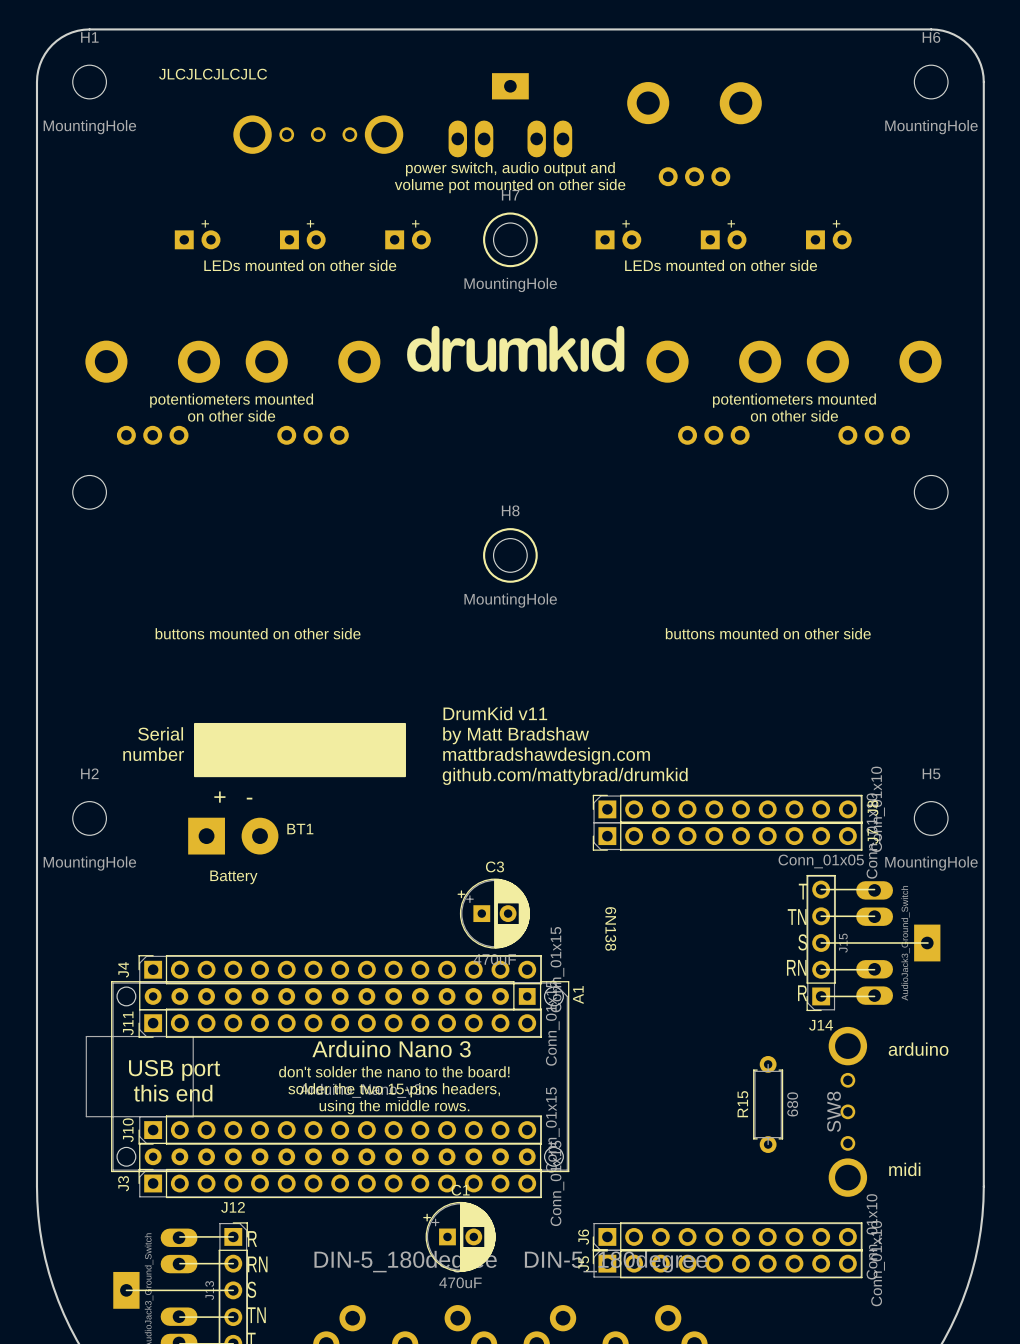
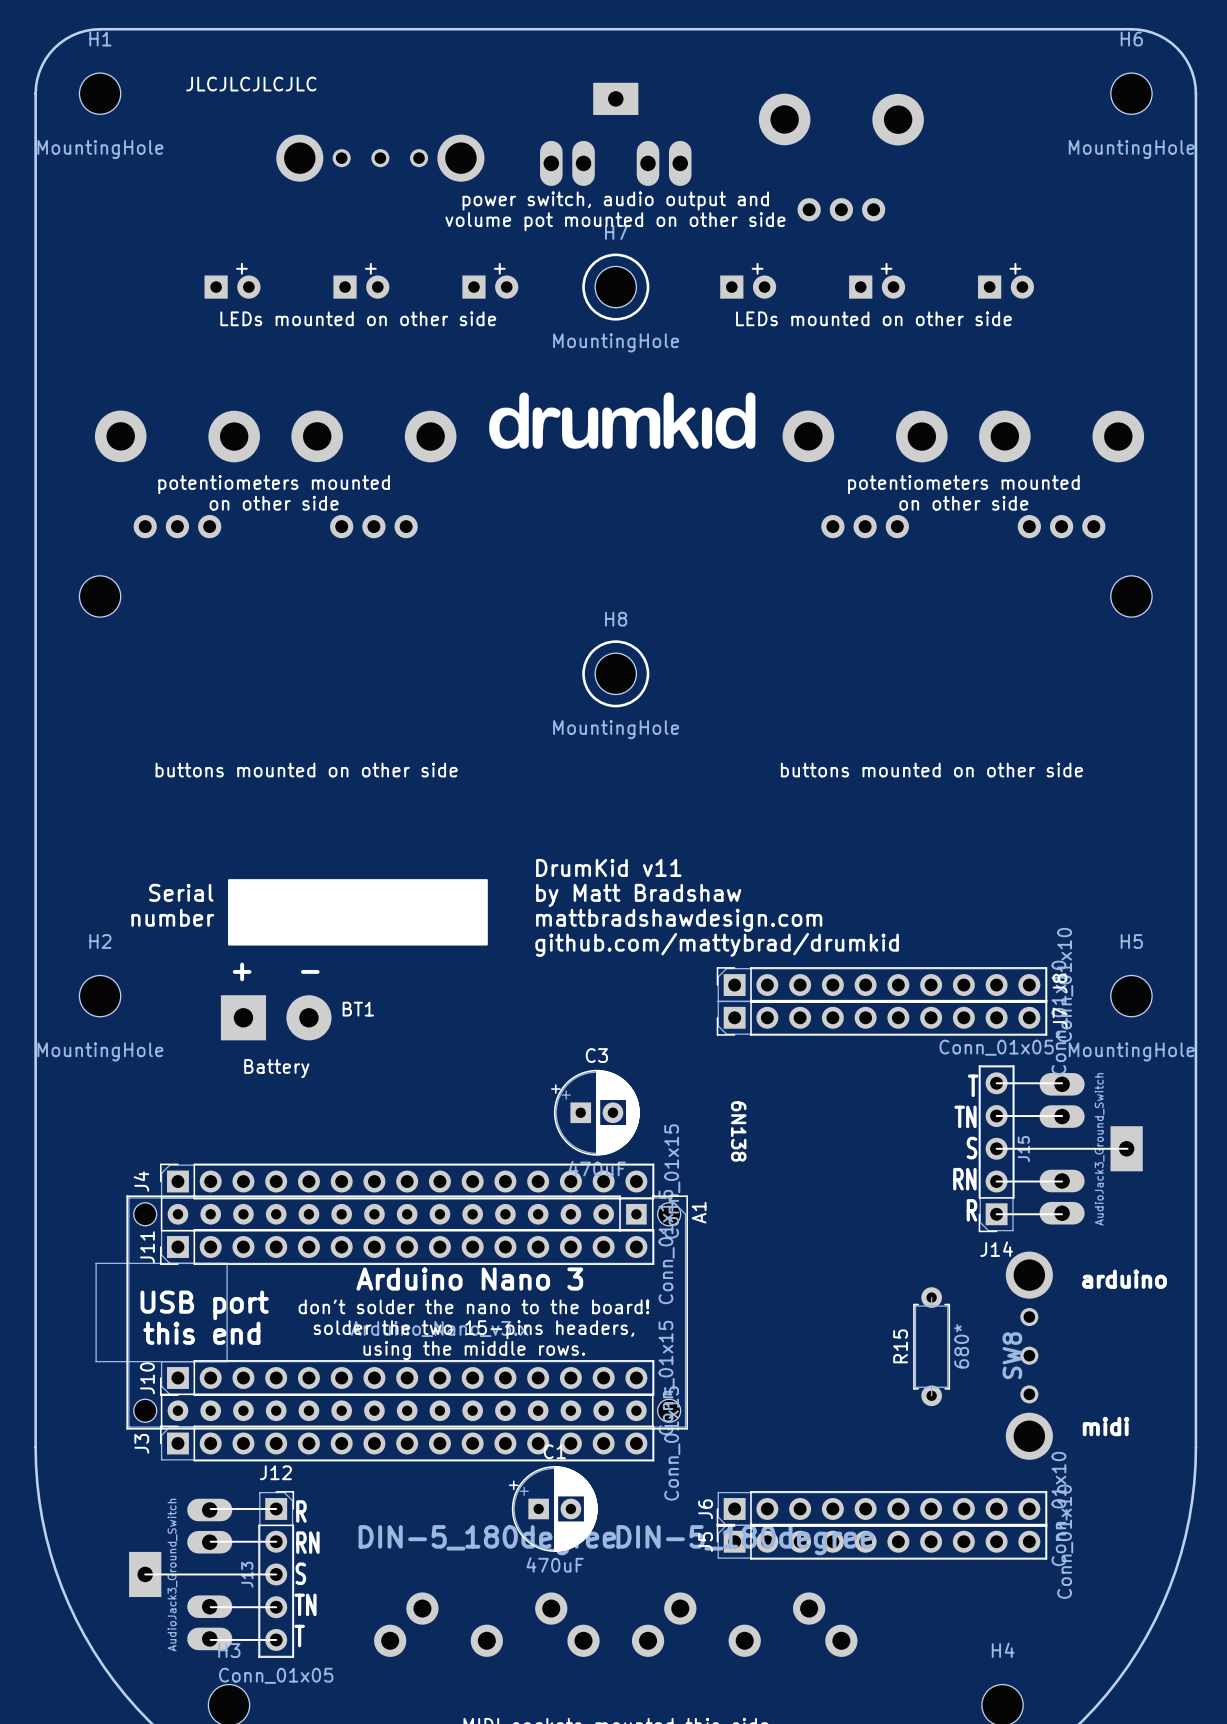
R15 value: 680 (792, 1104) -> 680* (961, 1346)

